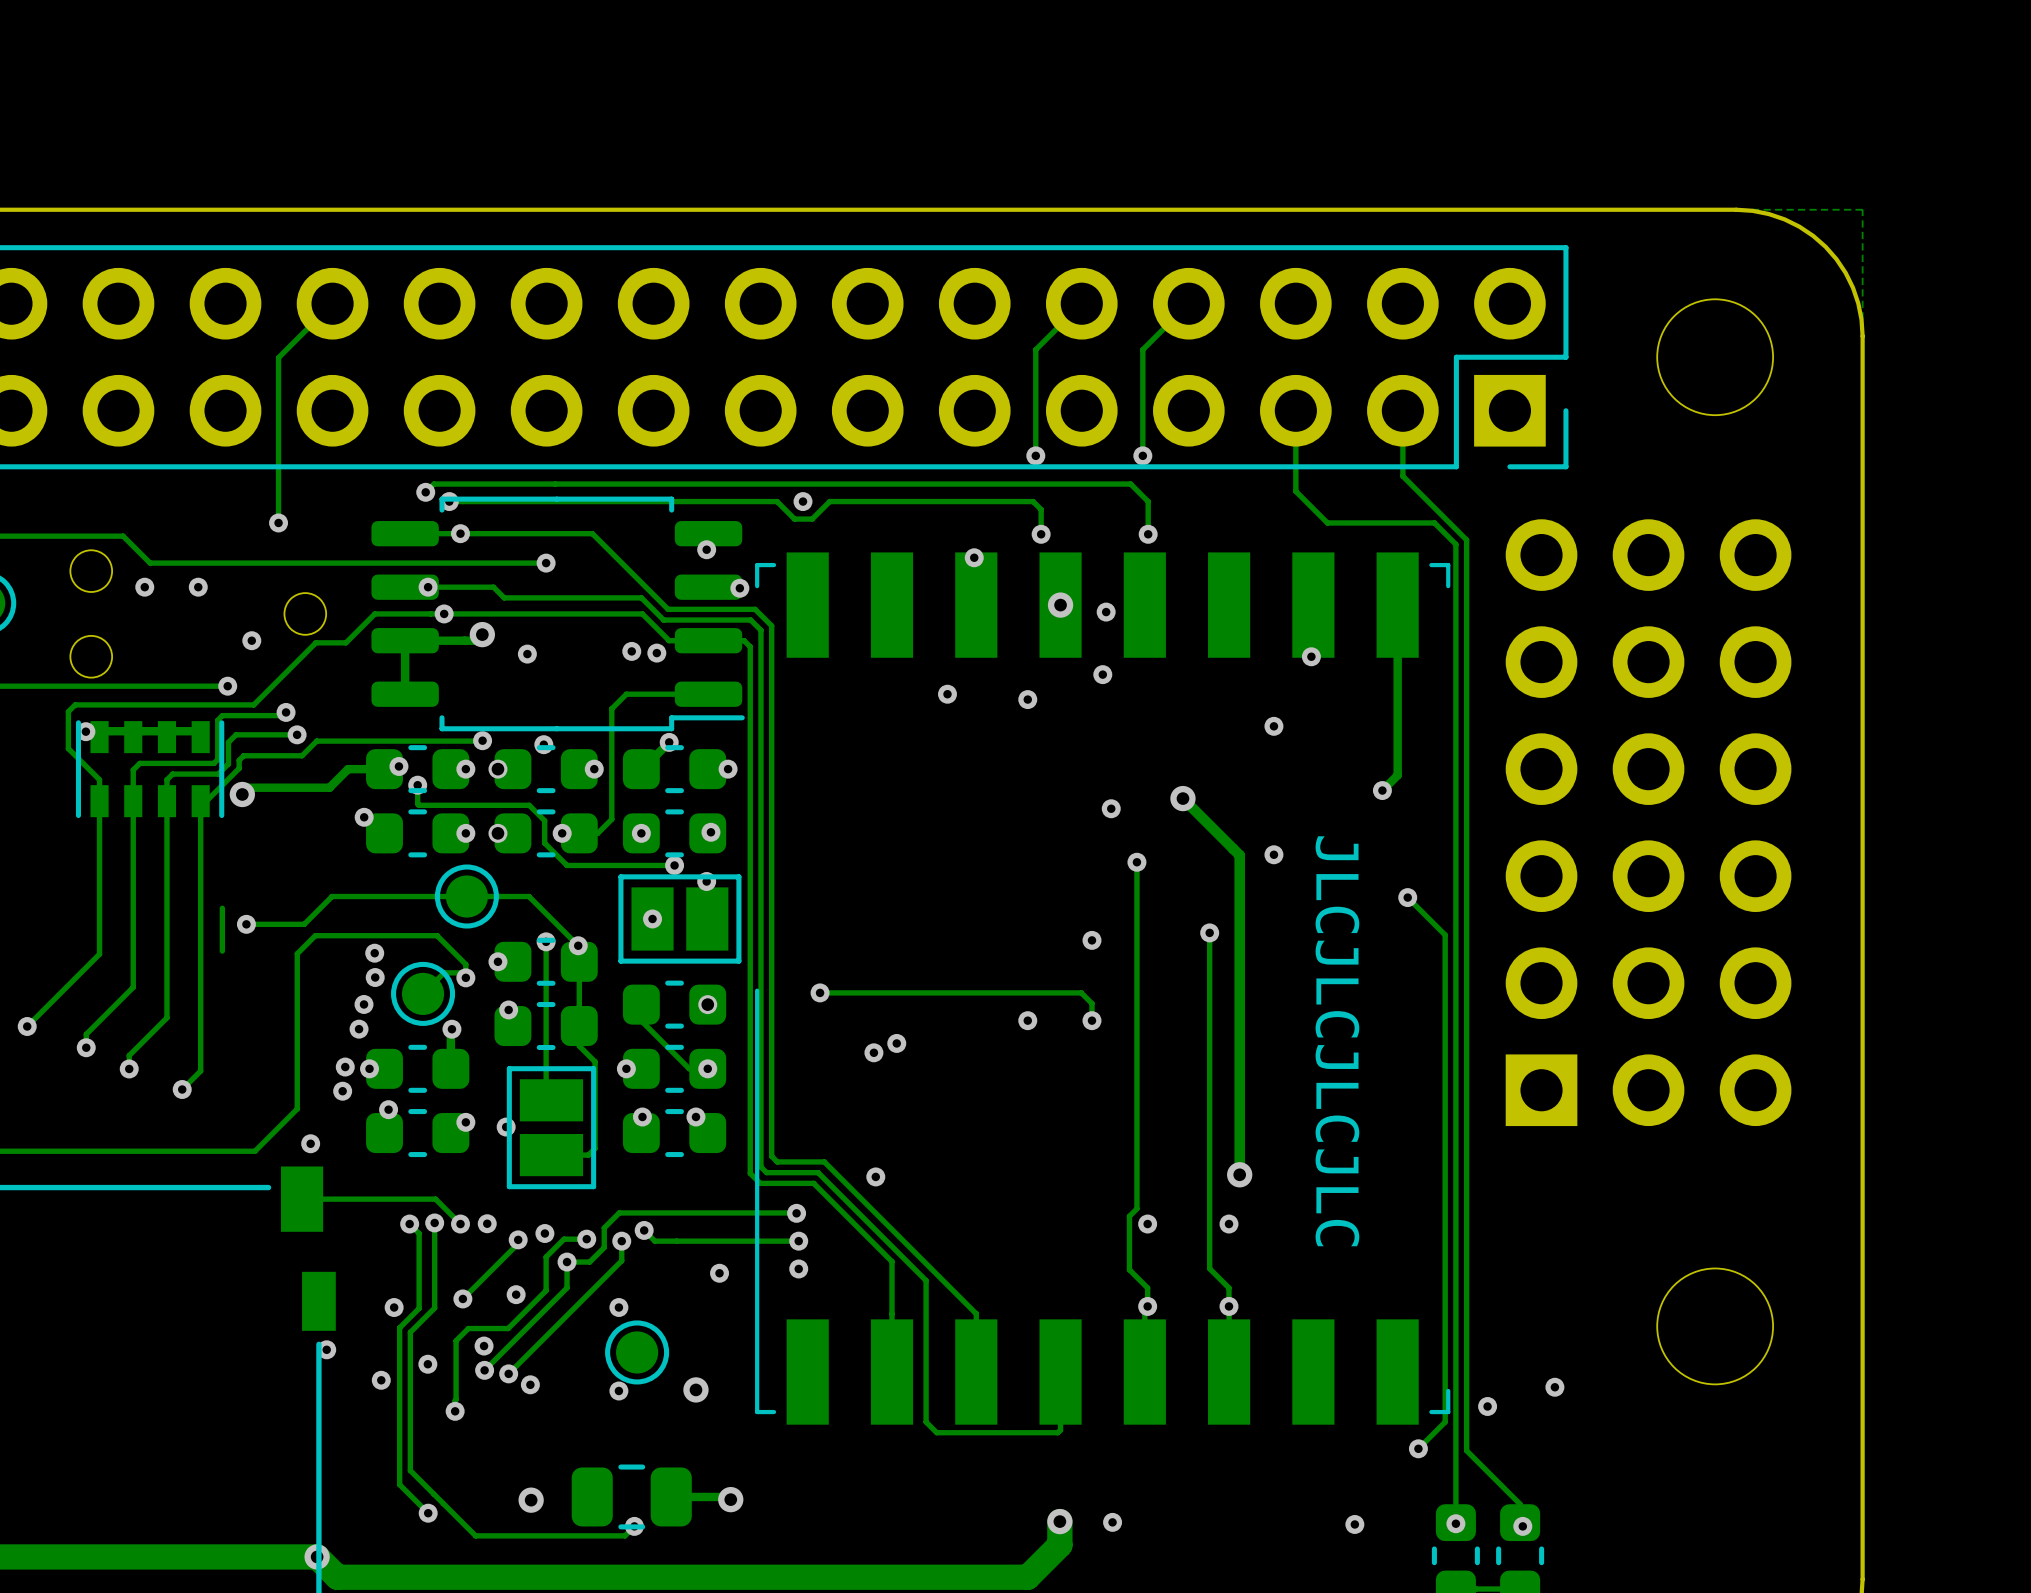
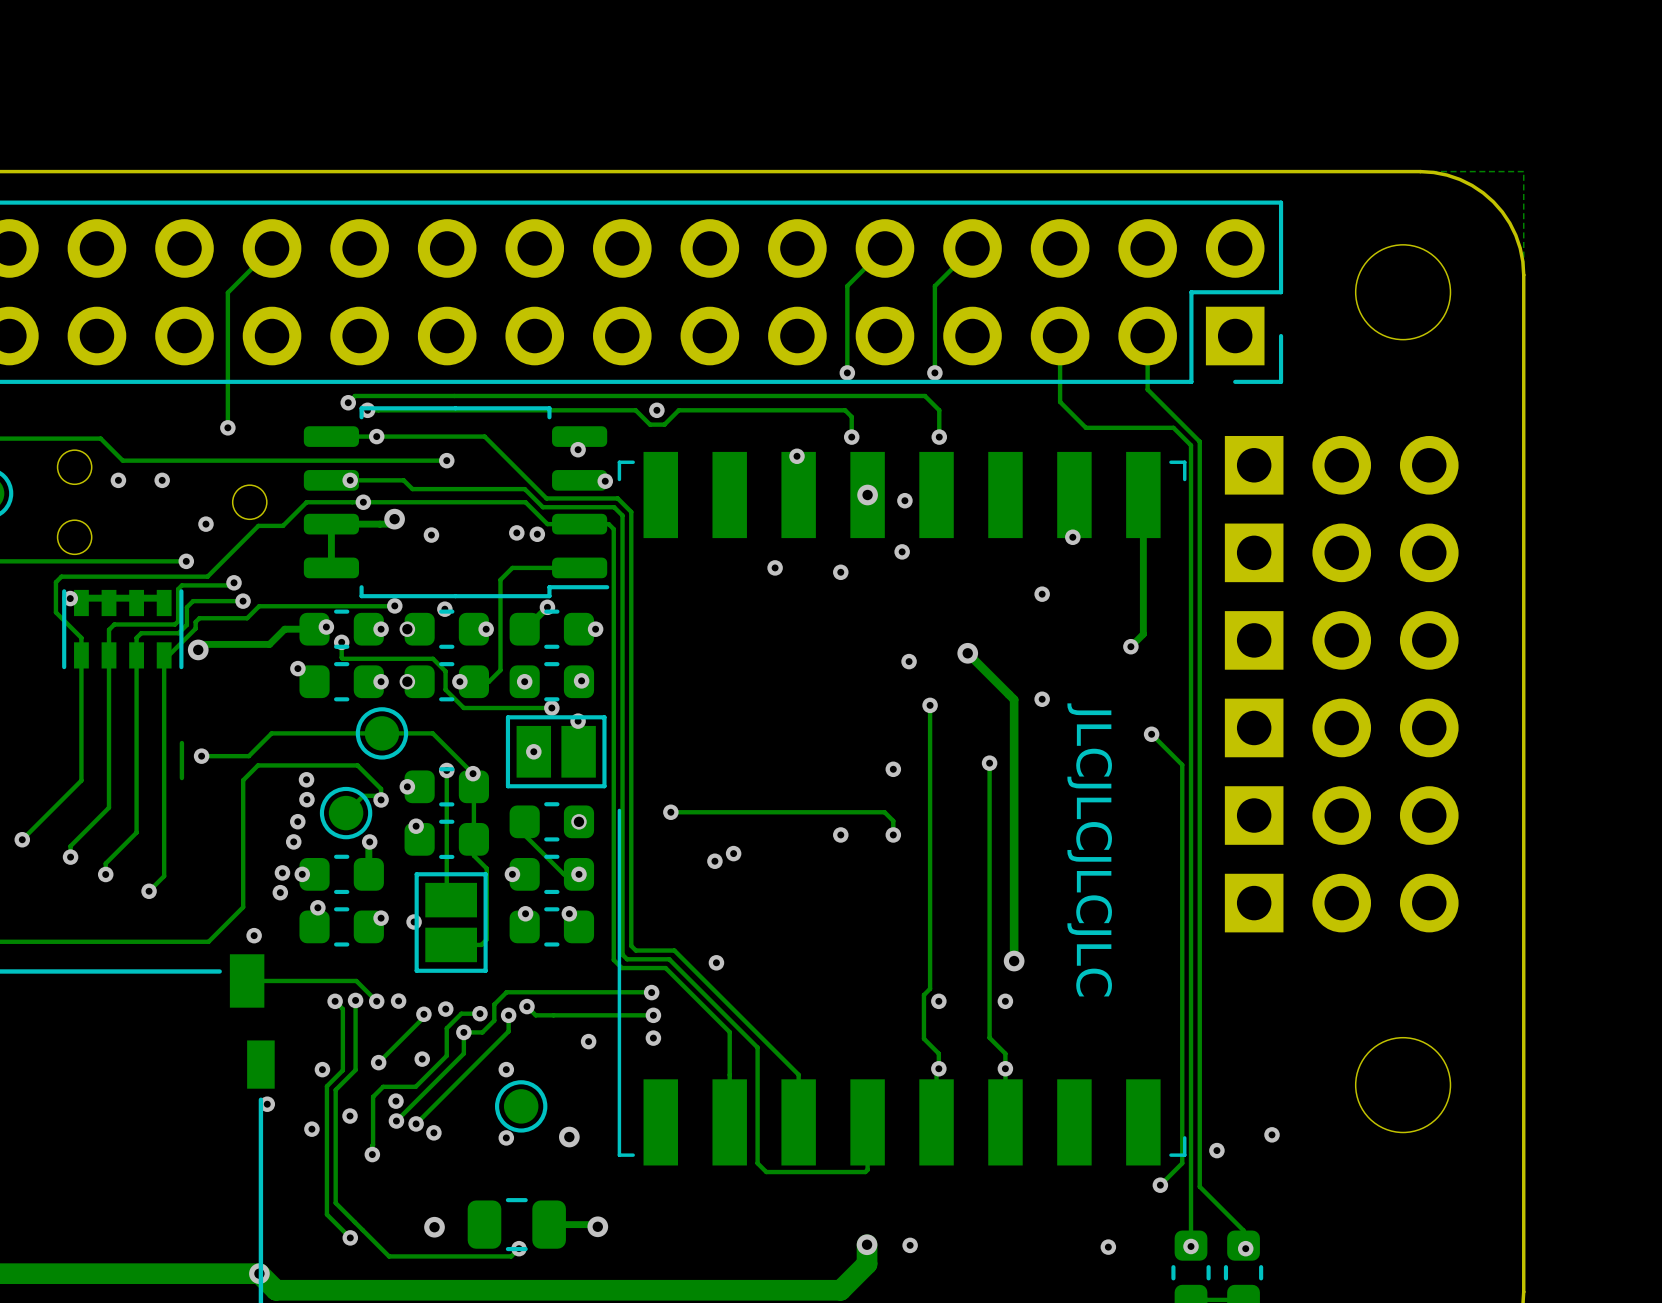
part: none -> (1341, 465)
part: none -> (1341, 552)
part: none -> (1341, 640)
part: (1648, 822) -> none
part: none -> (1341, 727)
part: none -> (1341, 815)
part: none -> (1341, 903)

